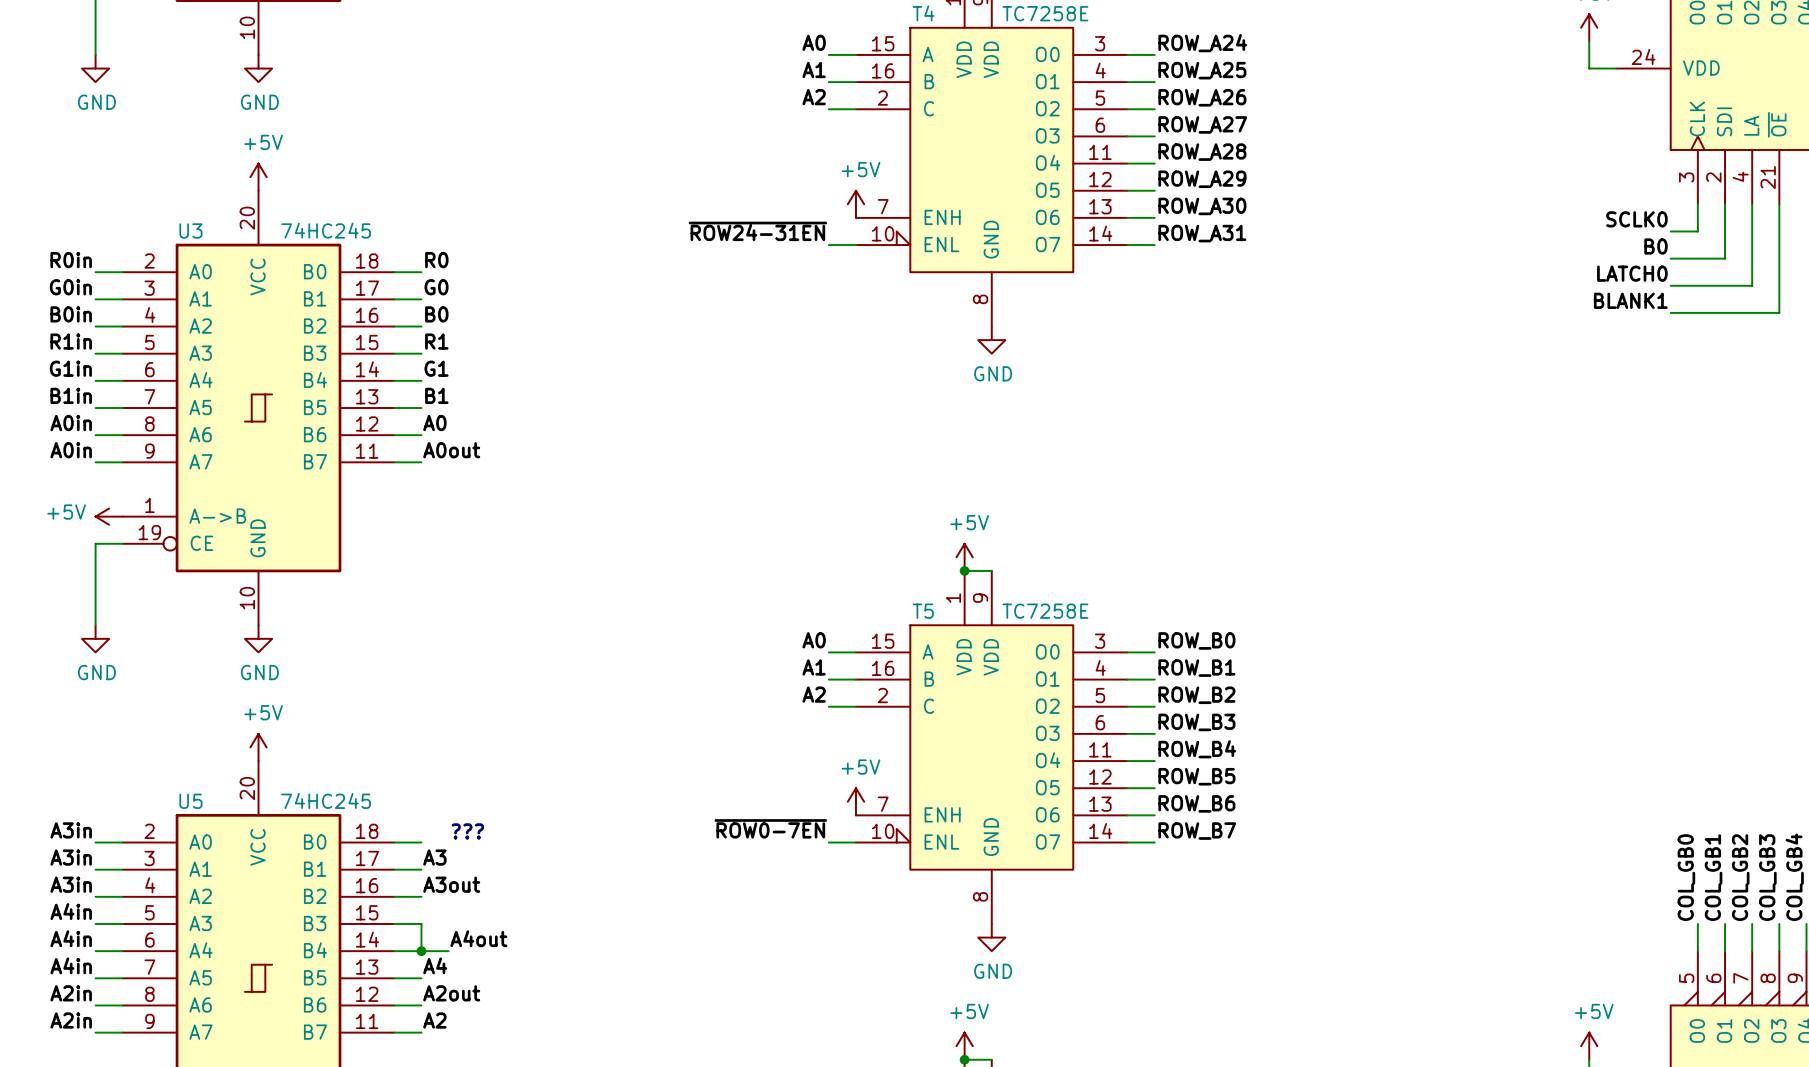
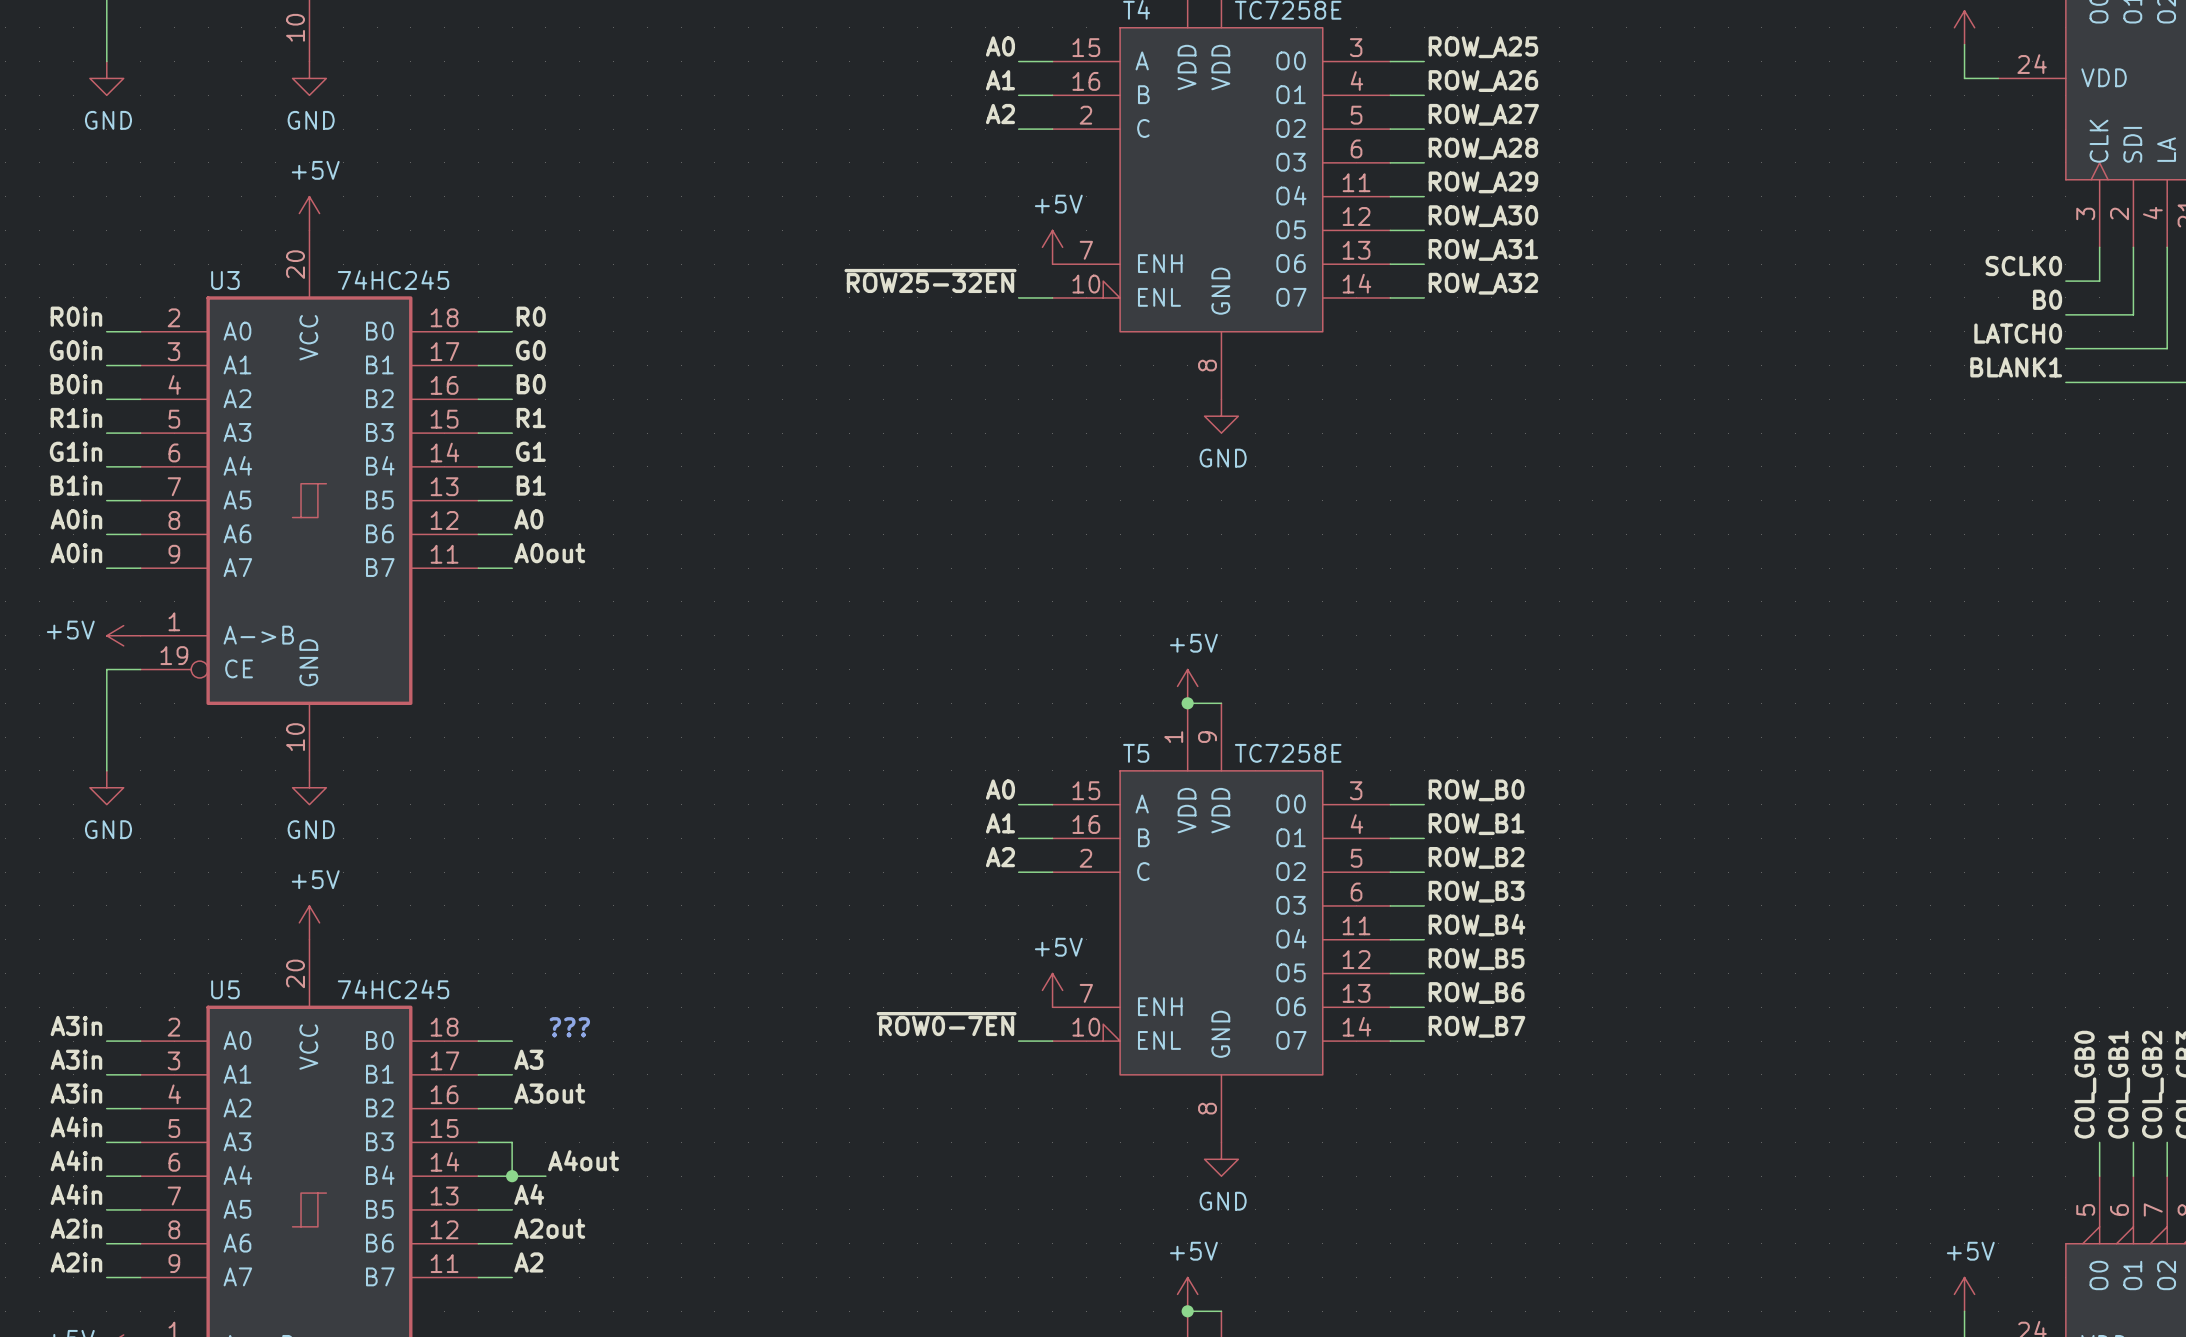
label: ROW_A24 (1202, 43) -> ROW_A25 (1483, 47)
label: ROW_A25 (1202, 70) -> ROW_A26 (1483, 81)
label: ROW_A26 (1202, 97) -> ROW_A27 (1483, 114)
label: ROW_A27 (1202, 124) -> ROW_A28 (1483, 148)
label: ROW_A28 (1202, 152) -> ROW_A29 (1483, 182)
label: ROW_A29 (1202, 179) -> ROW_A30 (1483, 216)
label: ROW_A30 (1202, 206) -> ROW_A31 (1483, 249)
label: ~{ROW24-31EN} (757, 231) -> ~{ROW25-32EN} (930, 280)
label: ROW_A31 (1202, 233) -> ROW_A32 (1483, 283)

